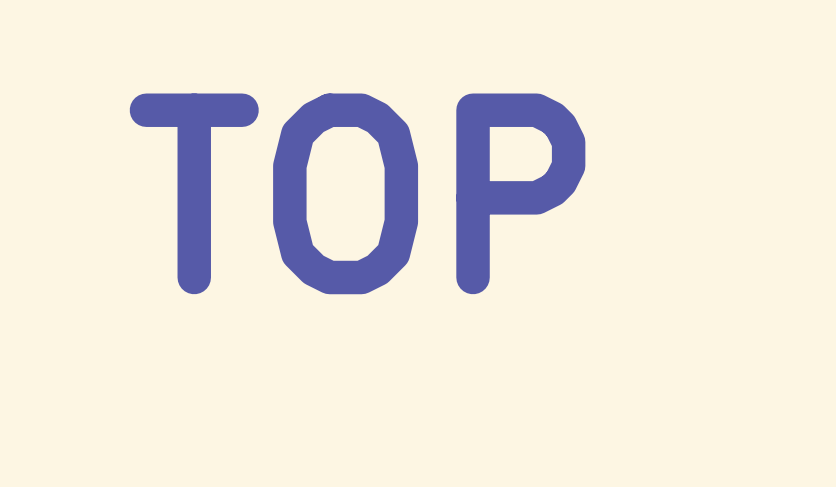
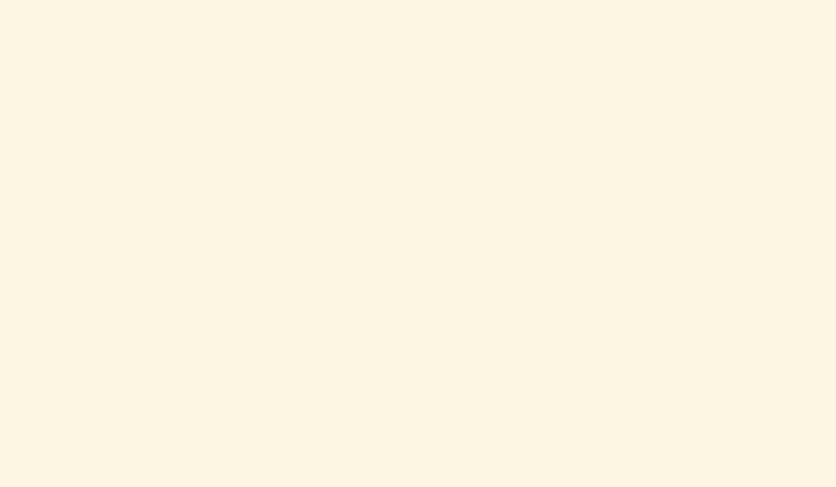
text: TOP (357, 193) -> none

